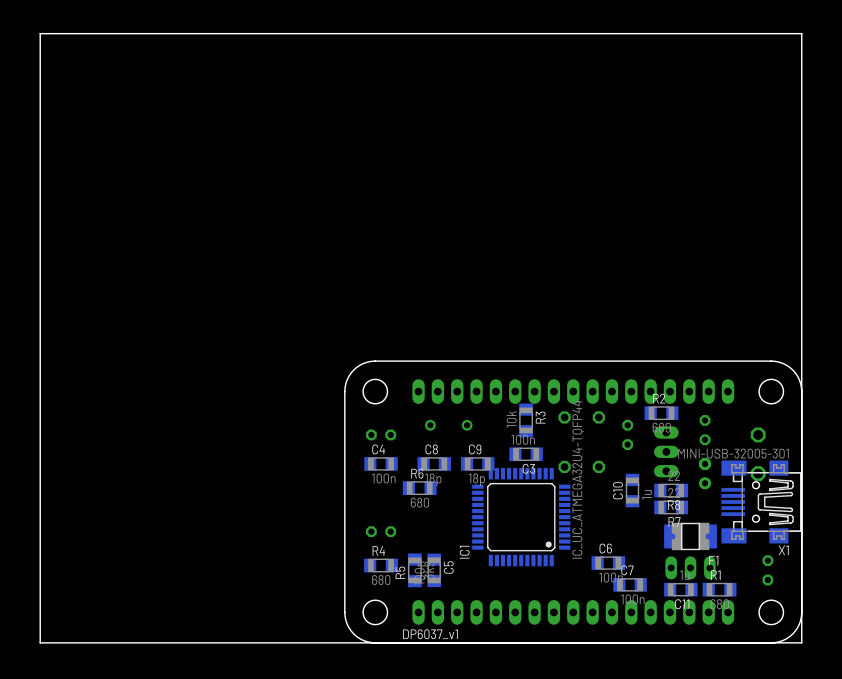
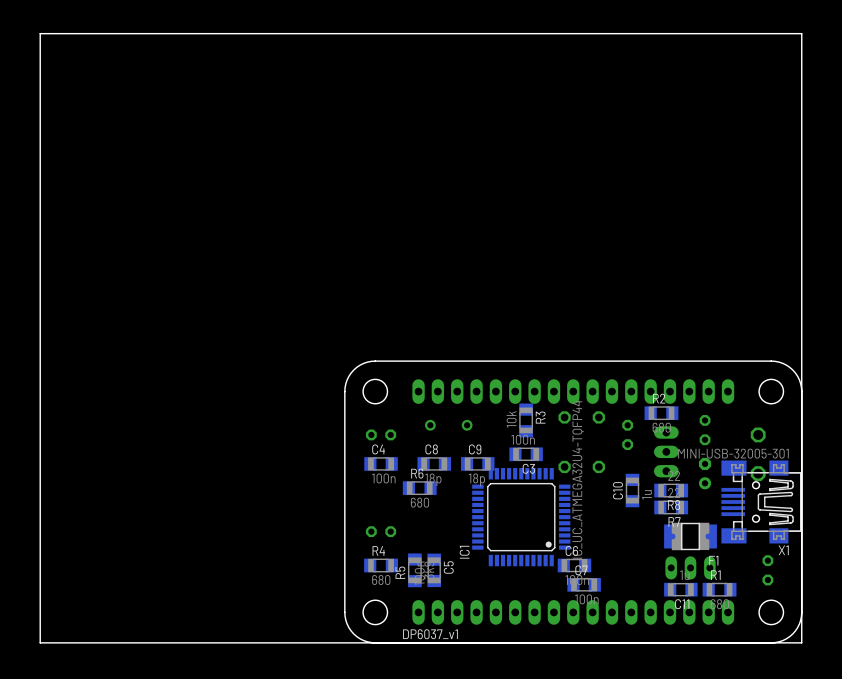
C6 position: (608, 563) -> (574, 565)
C7 position: (630, 584) -> (584, 584)

